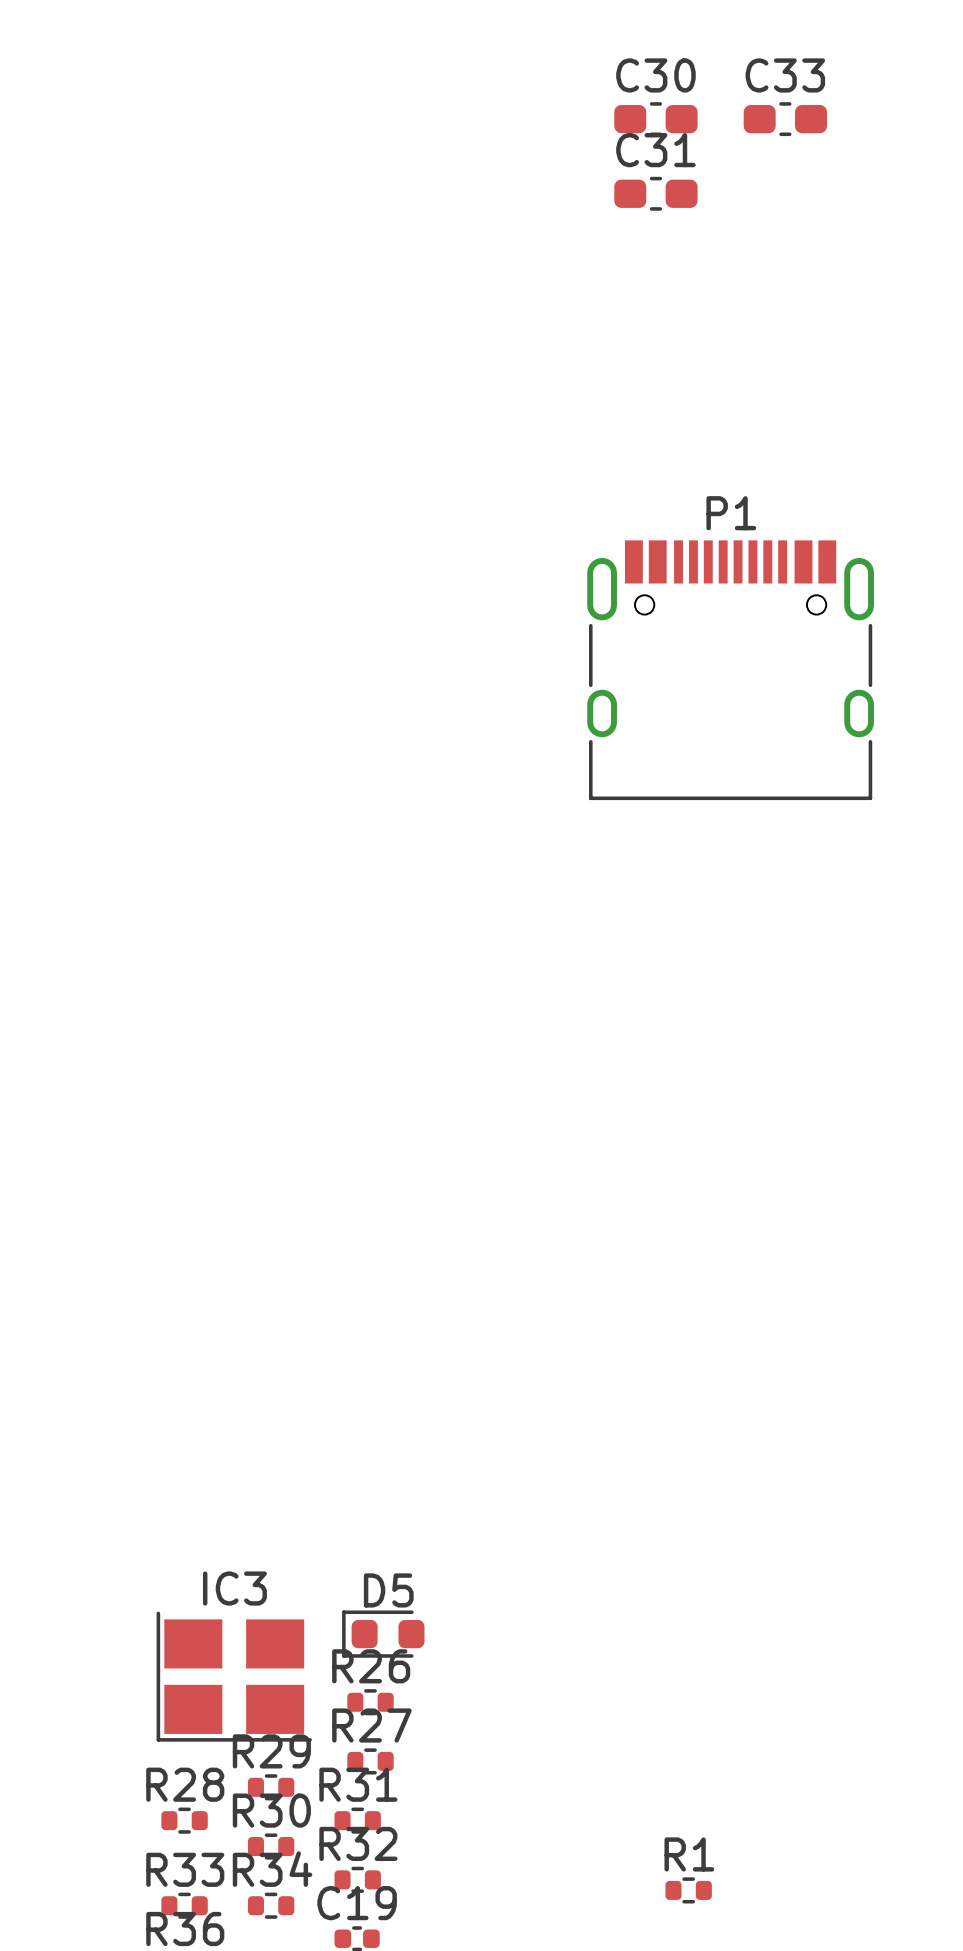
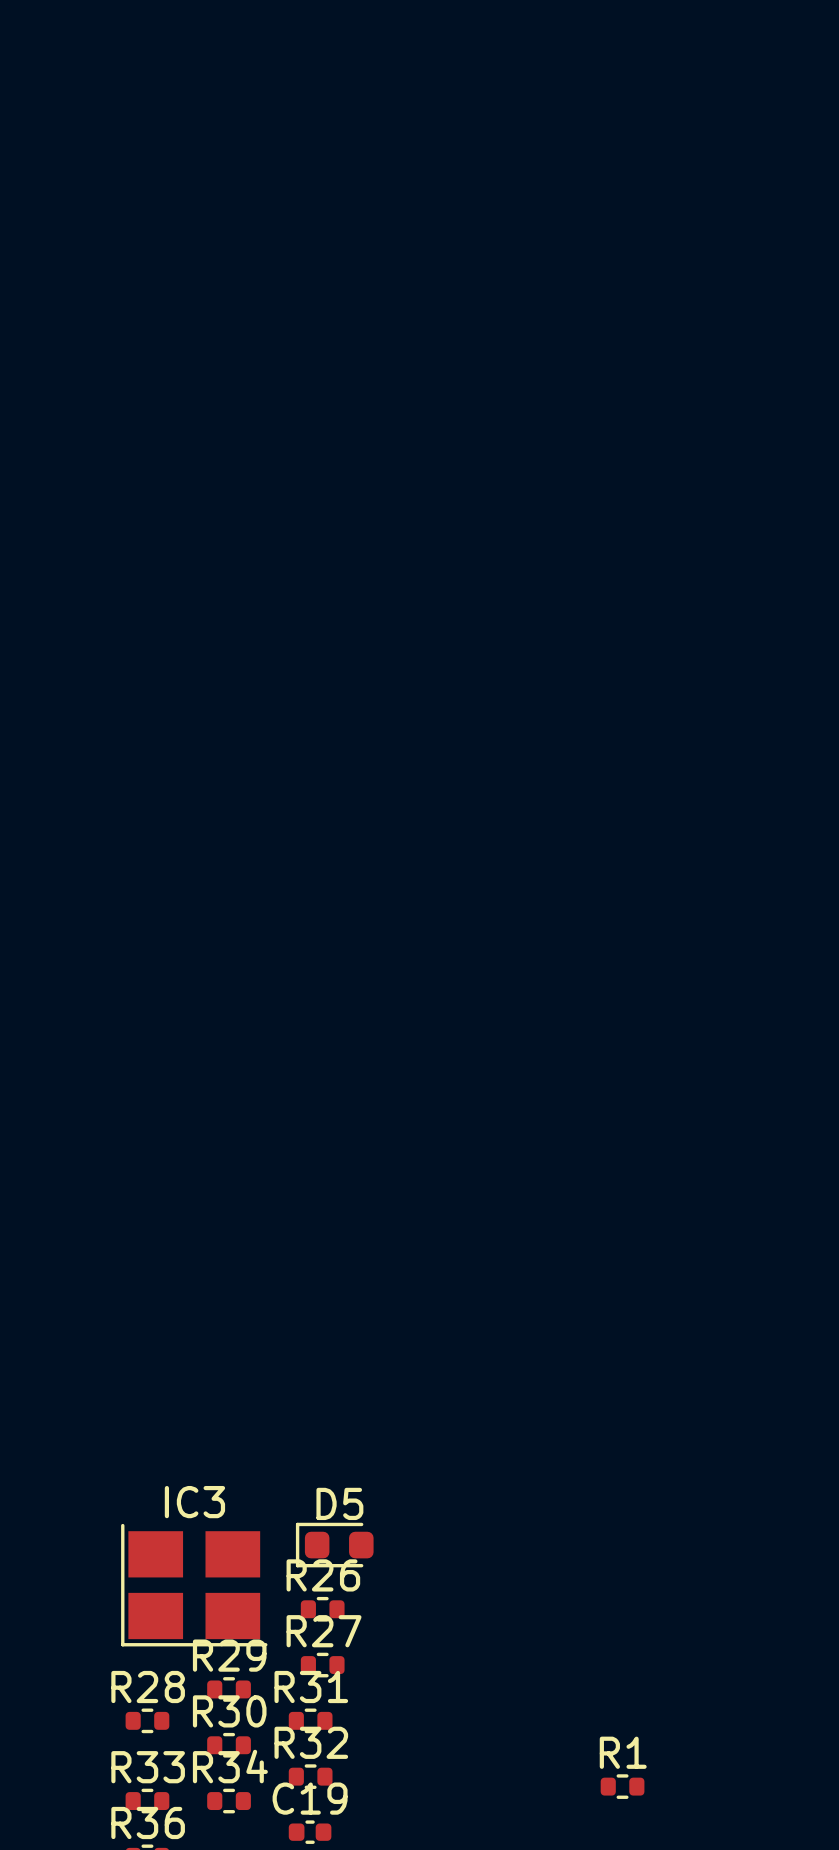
C30: (655, 119) -> none
C33: (785, 119) -> none
C31: (655, 193) -> none
P1: (730, 670) -> none

